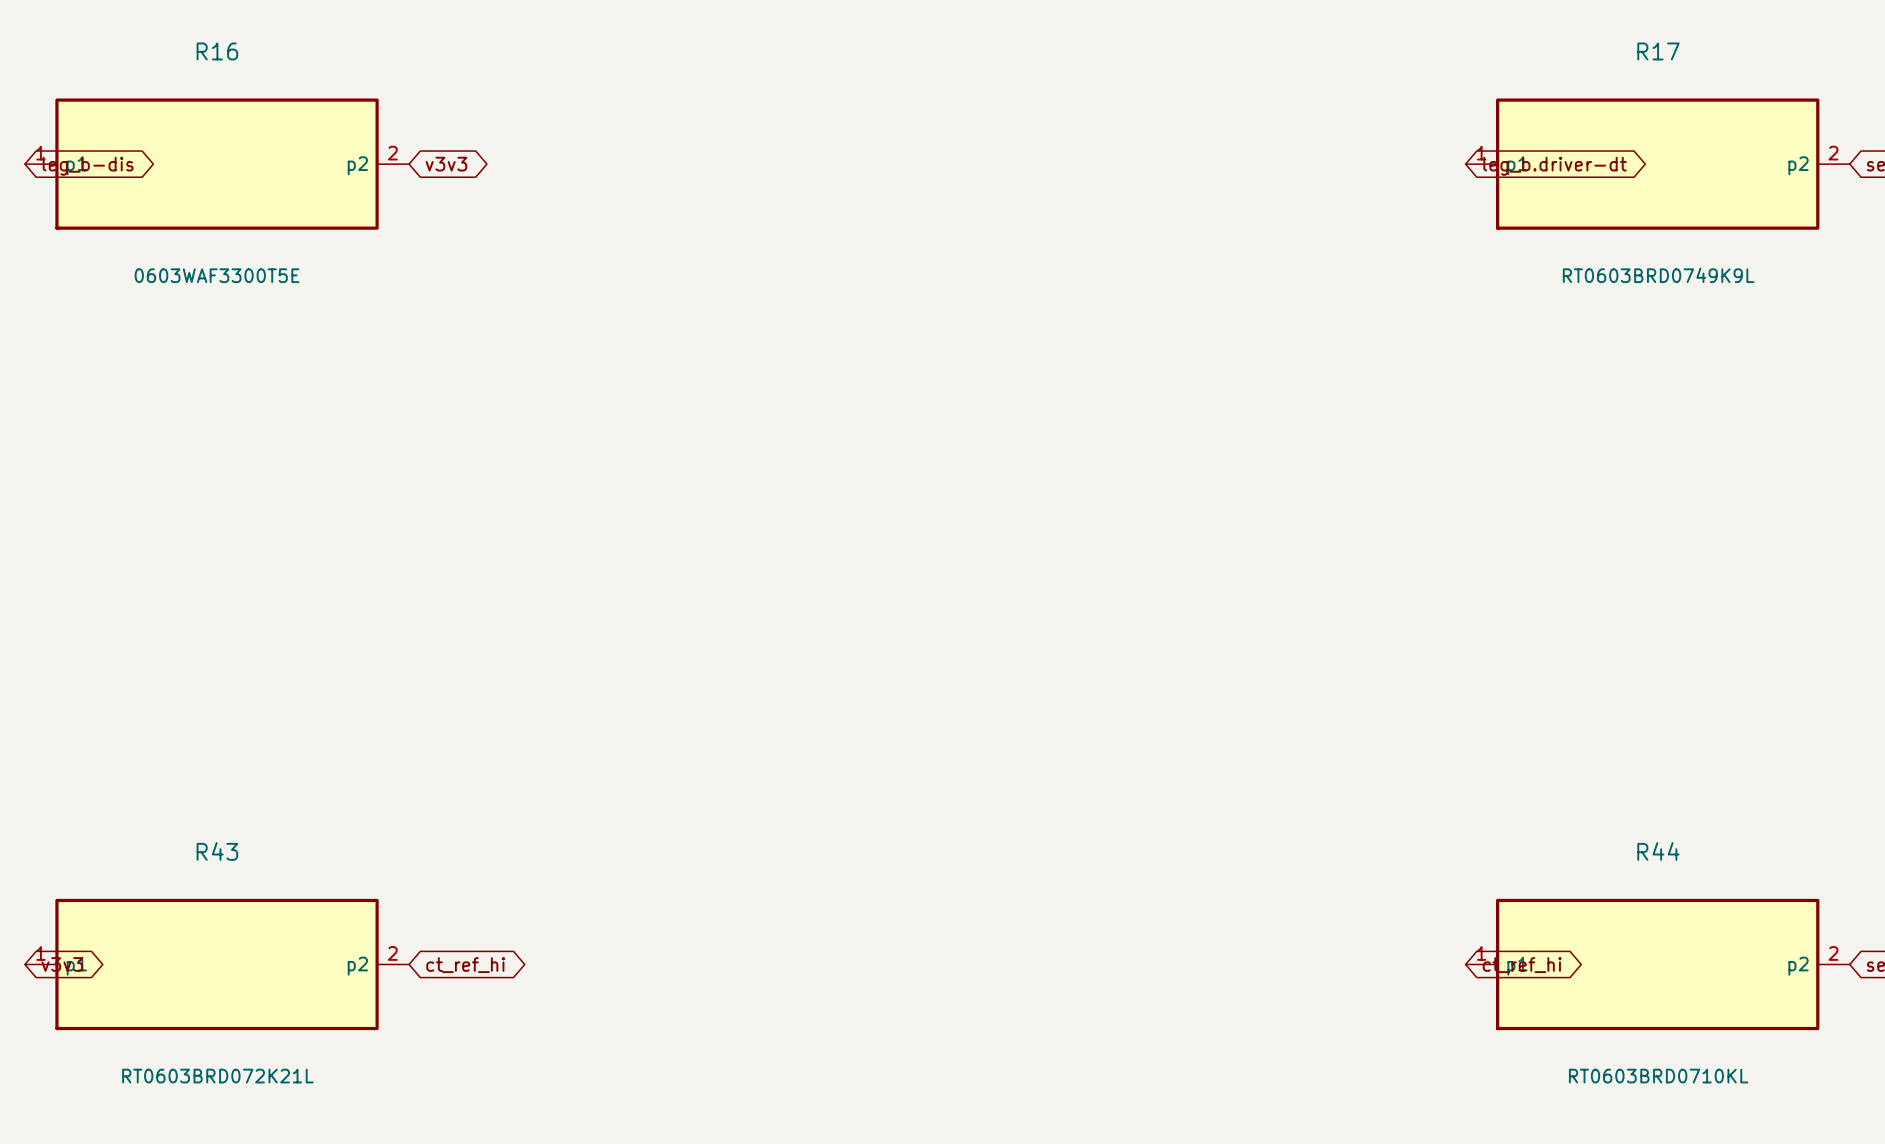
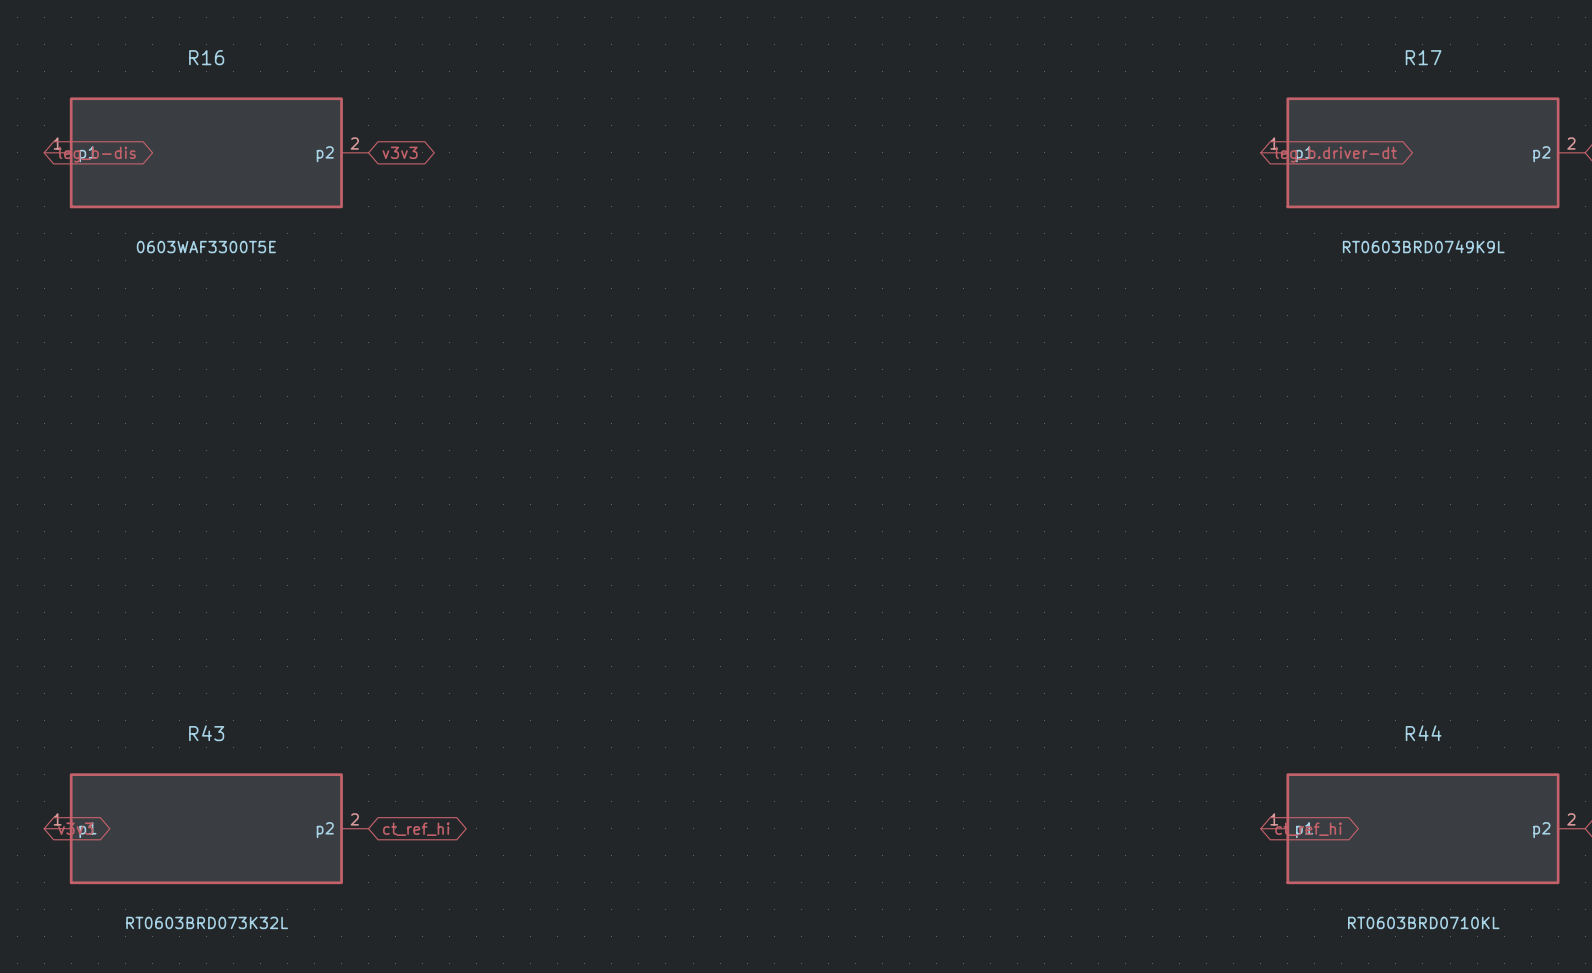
R43 value: RT0603BRD072K21L (217, 1076) -> RT0603BRD073K32L (207, 922)

